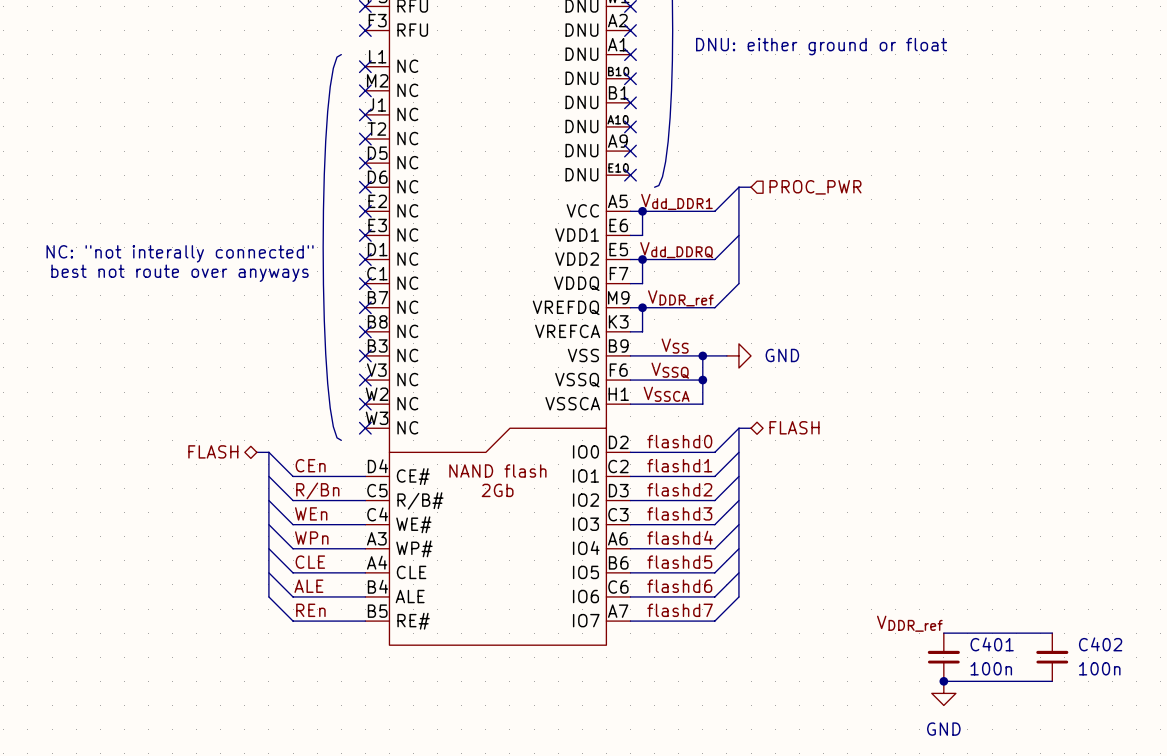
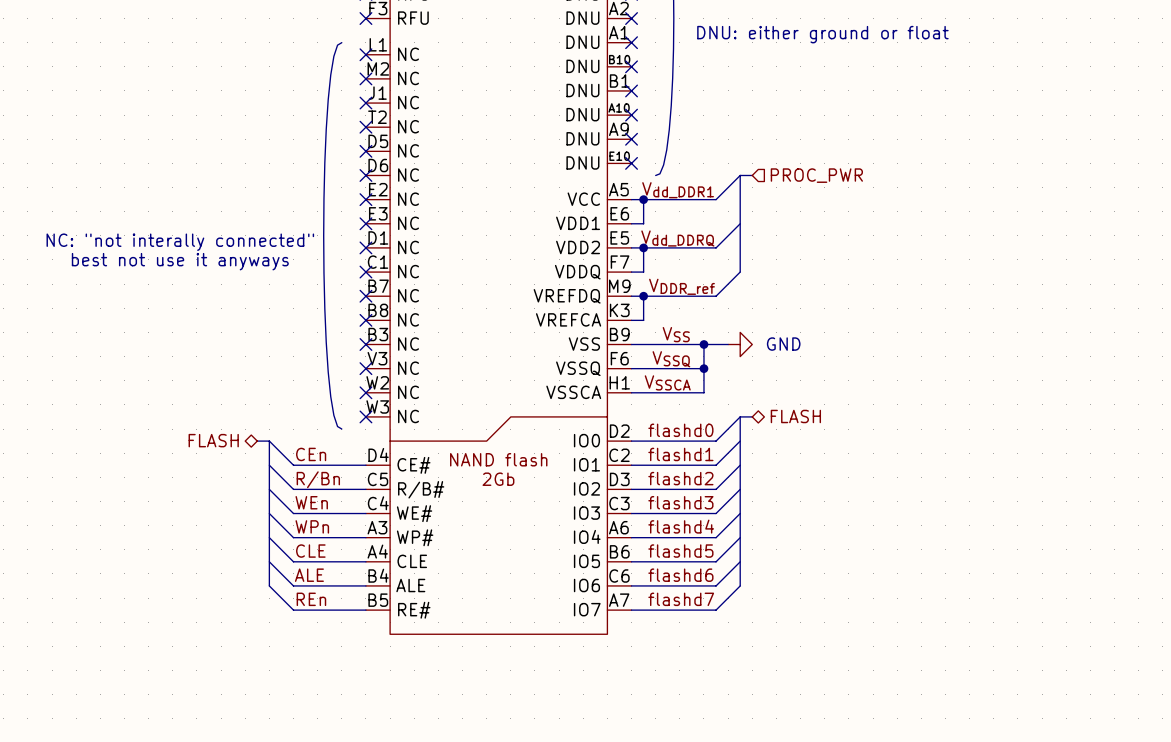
text: best not route over anyways (180, 273) -> best not use it anyways (180, 261)
label: VDDR_ref (909, 623) -> none
wire: (943, 633) (1052, 633) -> none
C401: 100n (943, 657) -> none
C402: 100n (1052, 657) -> none
wire: (943, 681) (1052, 681) -> none
junction: (943, 681) -> none
power symbol: GND (943, 693) -> none

